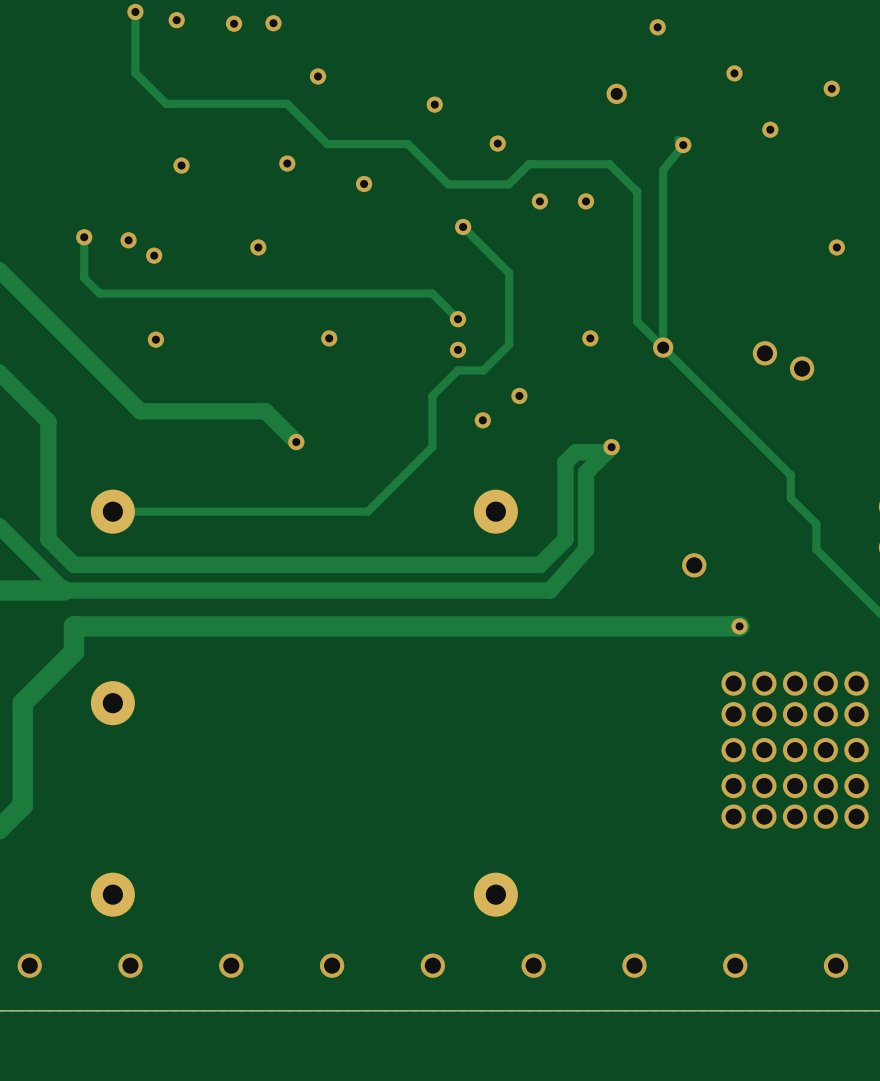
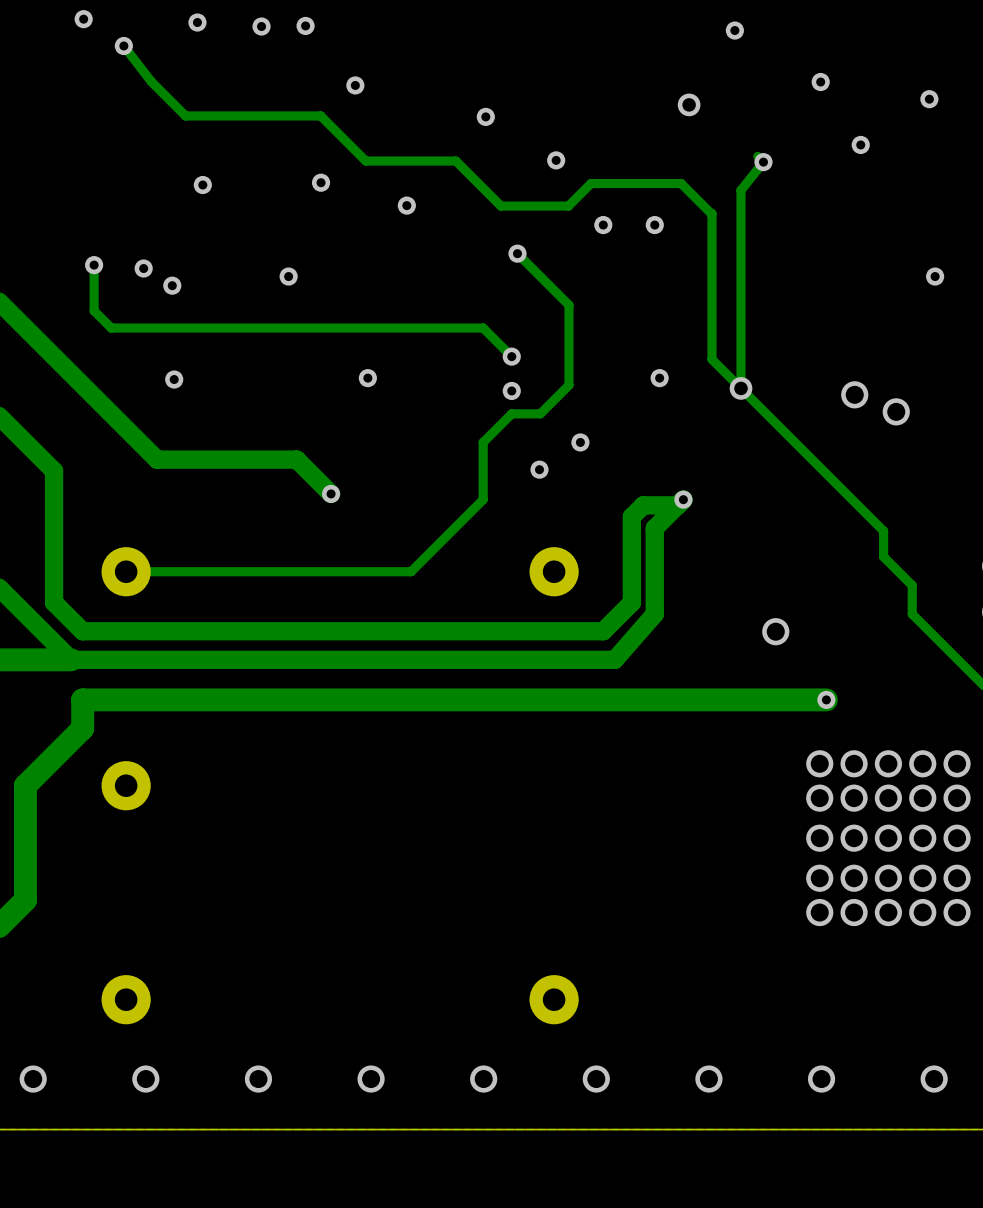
track: (135, 11) (135, 73) -> (123, 45) (151, 81)
via: (135, 11) -> none
via: none -> (83, 19)
via: none -> (123, 45)

